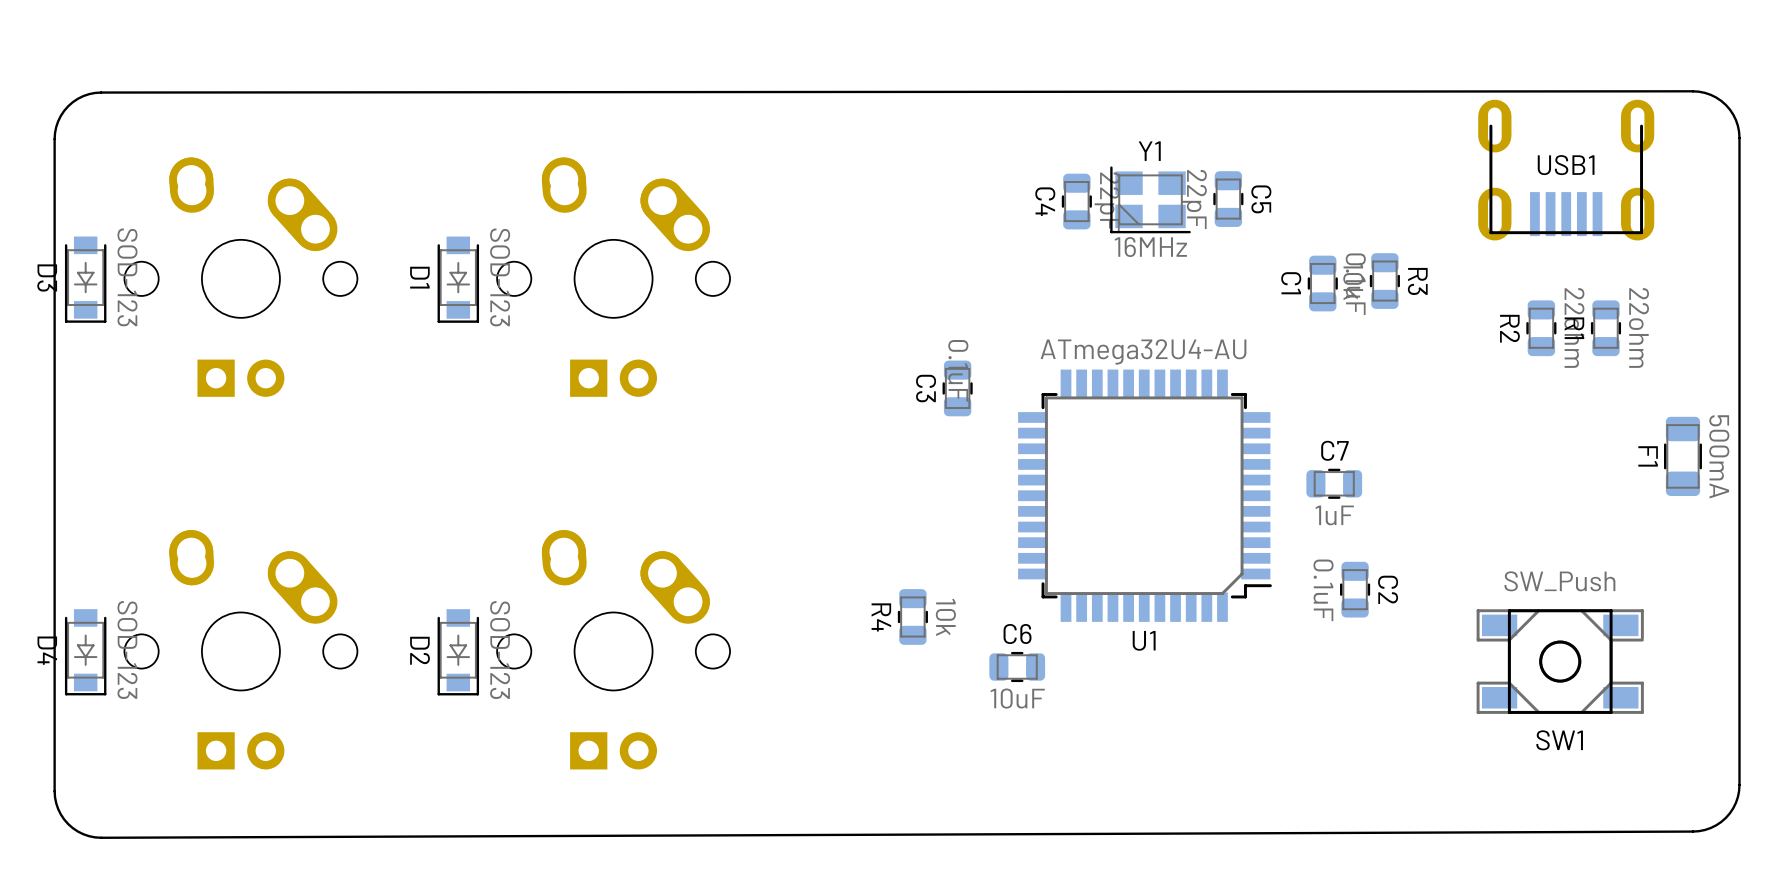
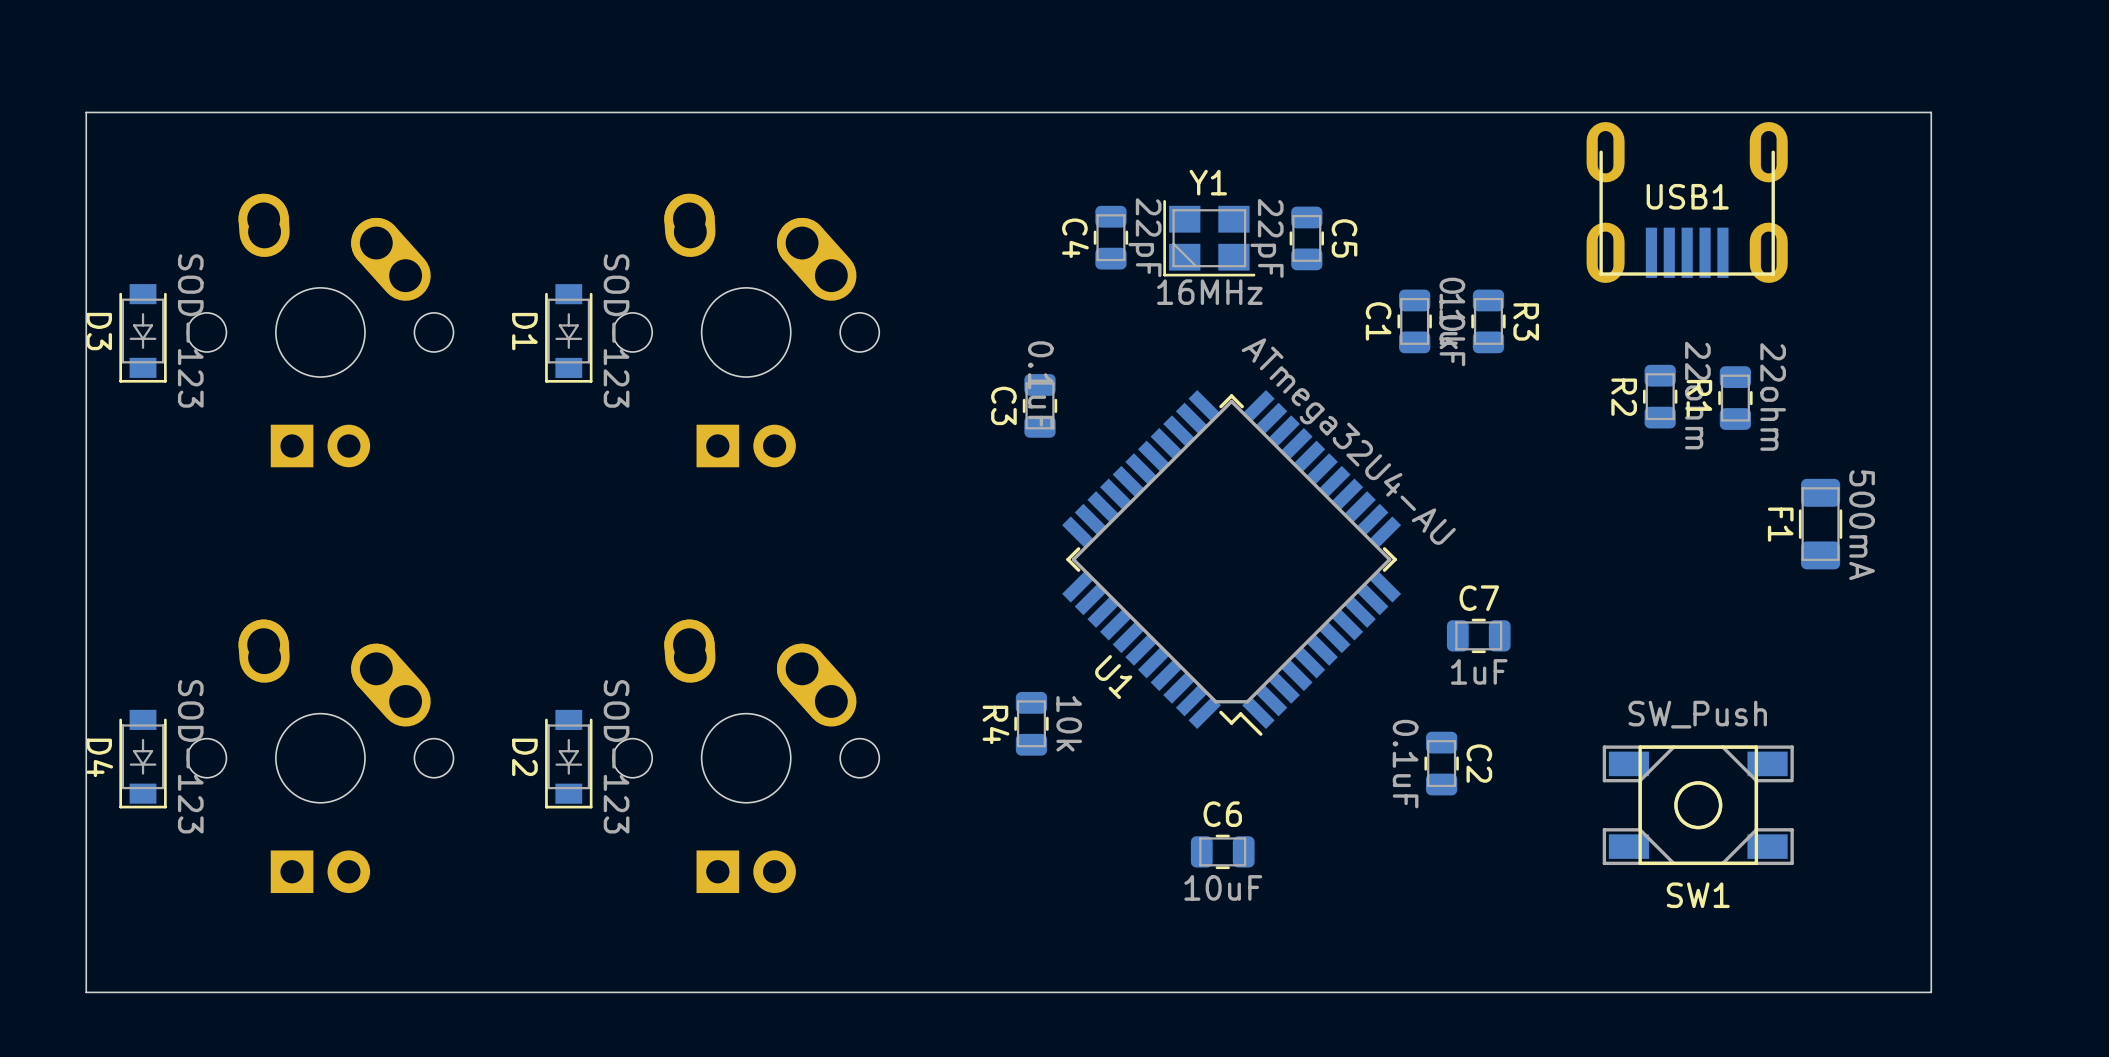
board edge: (1692, 91) (101, 92) (83, 96) (72, 102) (60, 115) (56, 127) (54, 139) (54, 791) (58, 809) (64, 819) (77, 831) (89, 836) (101, 837) (1692, 831) (1710, 828) (1721, 821) (1729, 813) (1737, 797) (1739, 784) (1739, 137) (1735, 120) (1725, 104) (1710, 94) (1692, 91) -> (1931, 112) (1931, 992) (86, 992) (86, 112) (1931, 112)
USB1 position: (1566, 170) -> (1687, 202)
Y1 position: (1150, 199) -> (1209, 238)
C5 position: (1228, 199) -> (1306, 238)
C4 position: (1076, 201) -> (1110, 237)
R3 position: (1384, 281) -> (1488, 321)
C1 position: (1322, 283) -> (1414, 321)
R2 position: (1541, 328) -> (1660, 396)
R1 position: (1605, 328) -> (1735, 398)
C3 position: (957, 388) -> (1039, 405)
F1 position: (1682, 456) -> (1820, 524)
C7 position: (1334, 483) -> (1478, 635)
U1 rotation: 0° (1144, 495) -> 45° clockwise (1231, 562)
C2 position: (1355, 589) -> (1441, 763)
R4 position: (912, 616) -> (1031, 723)
SW1 position: (1560, 661) -> (1698, 805)
C6 position: (1017, 666) -> (1222, 851)

